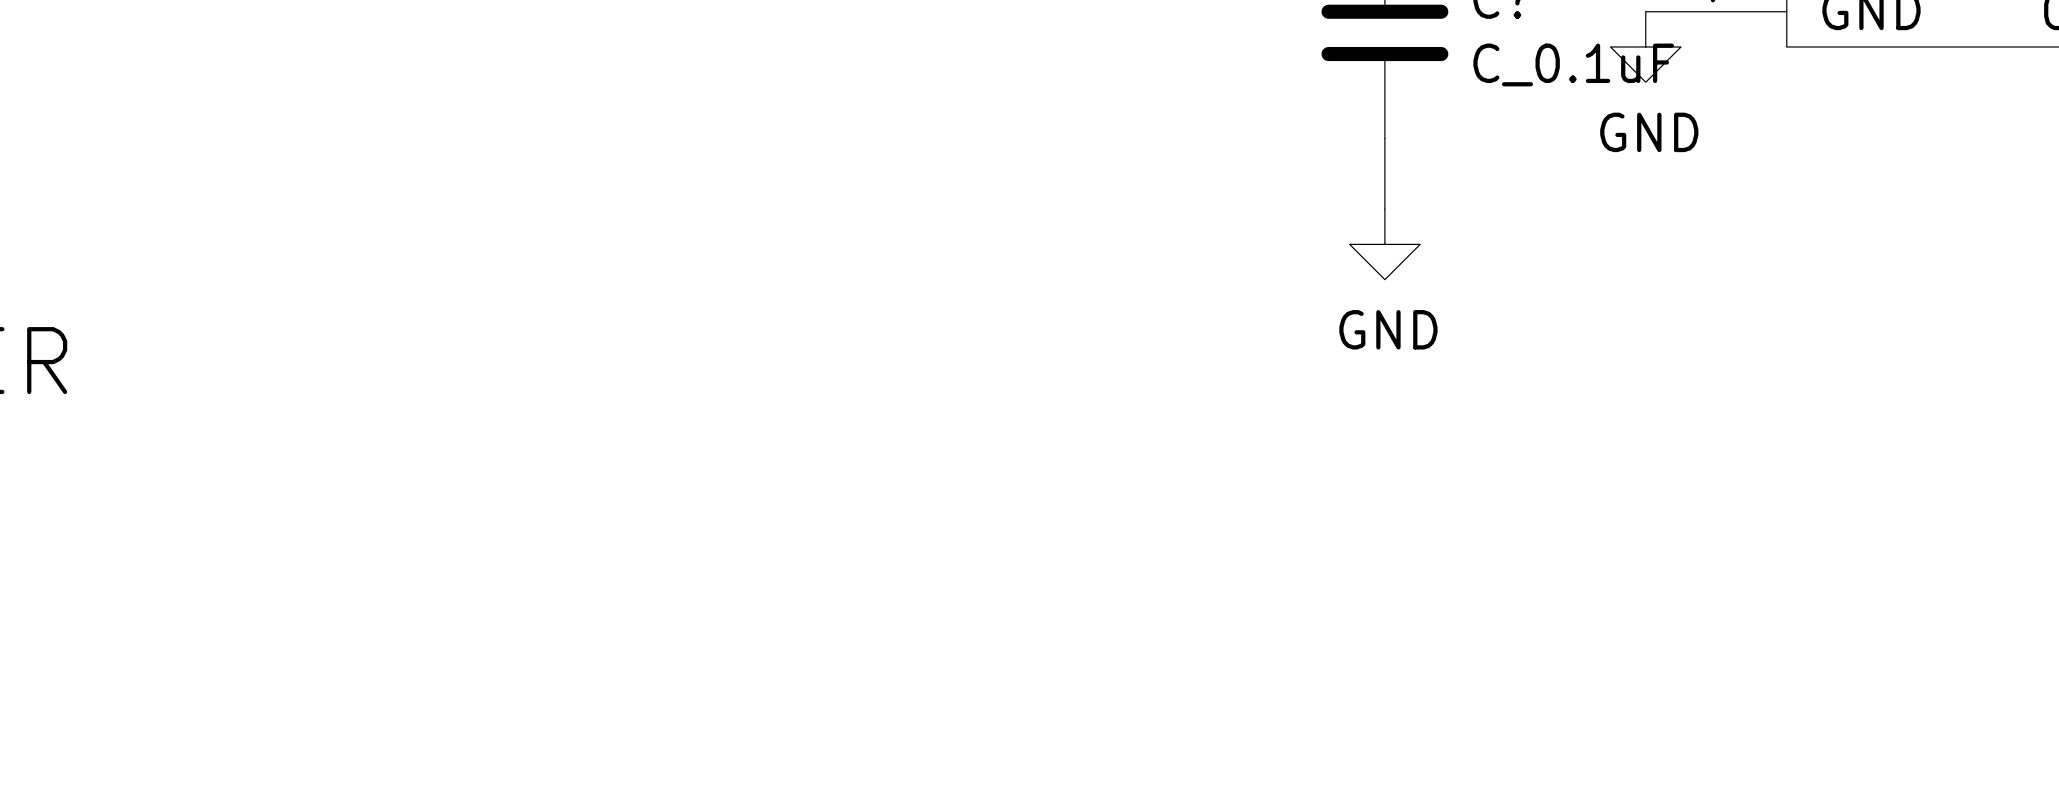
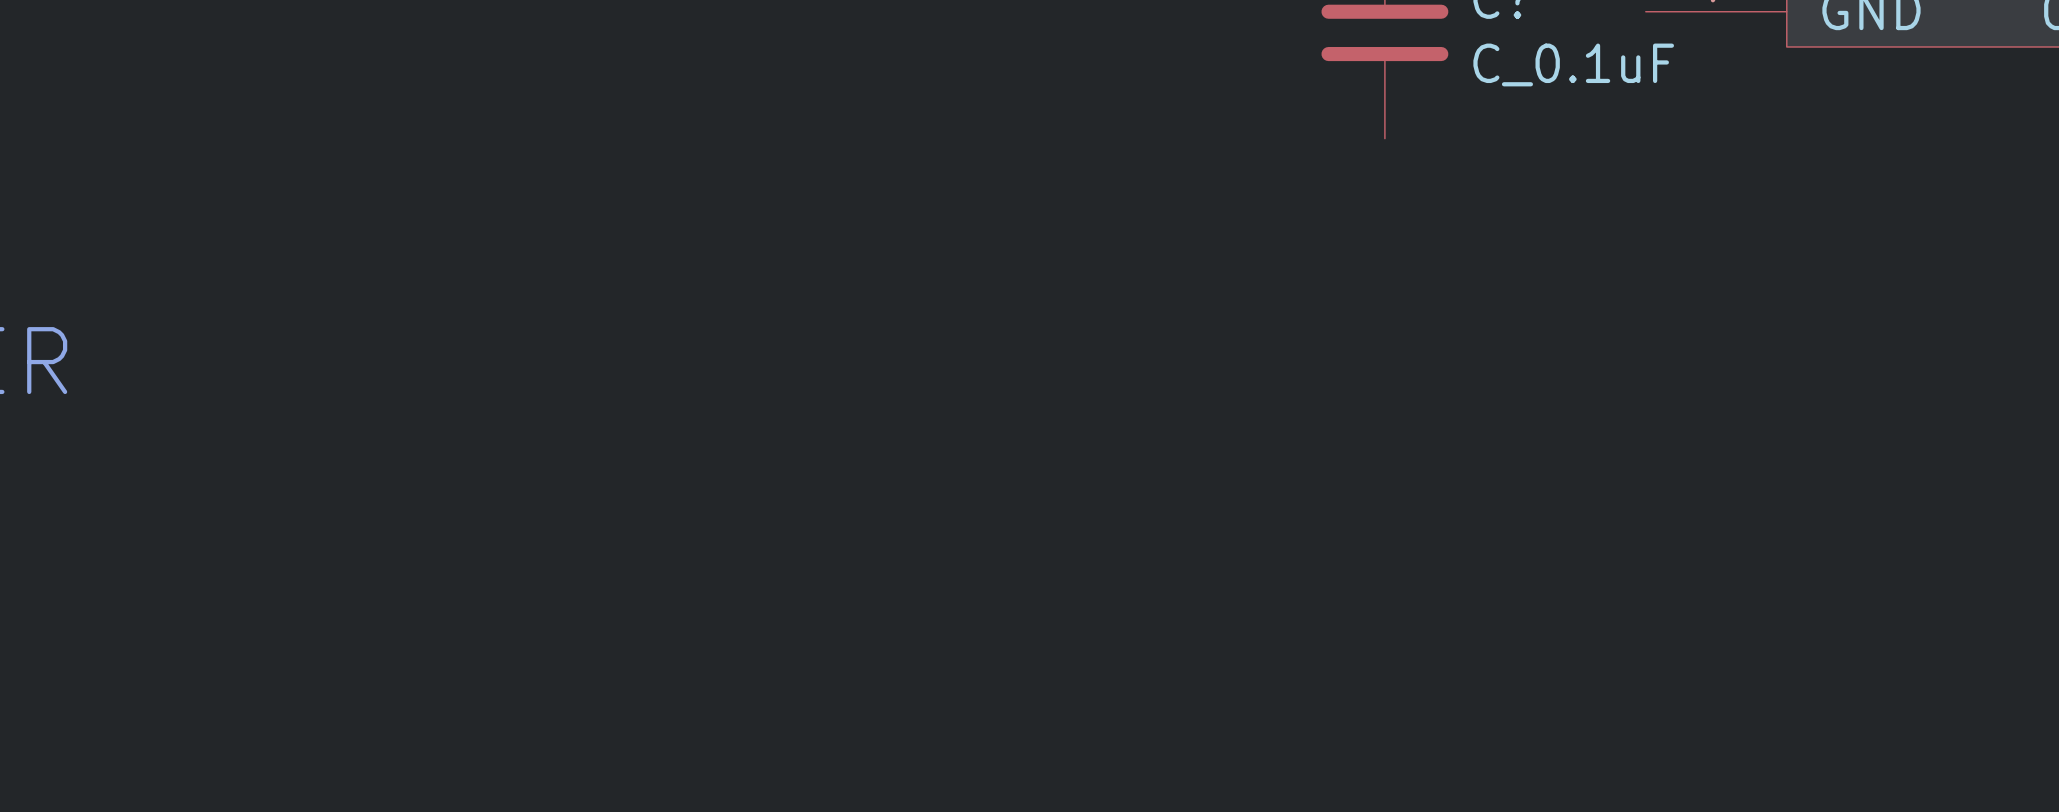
power symbol: GND (1645, 46) -> none
wire: (1384, 138) (1384, 209) -> none
power symbol: GND (1384, 244) -> none

